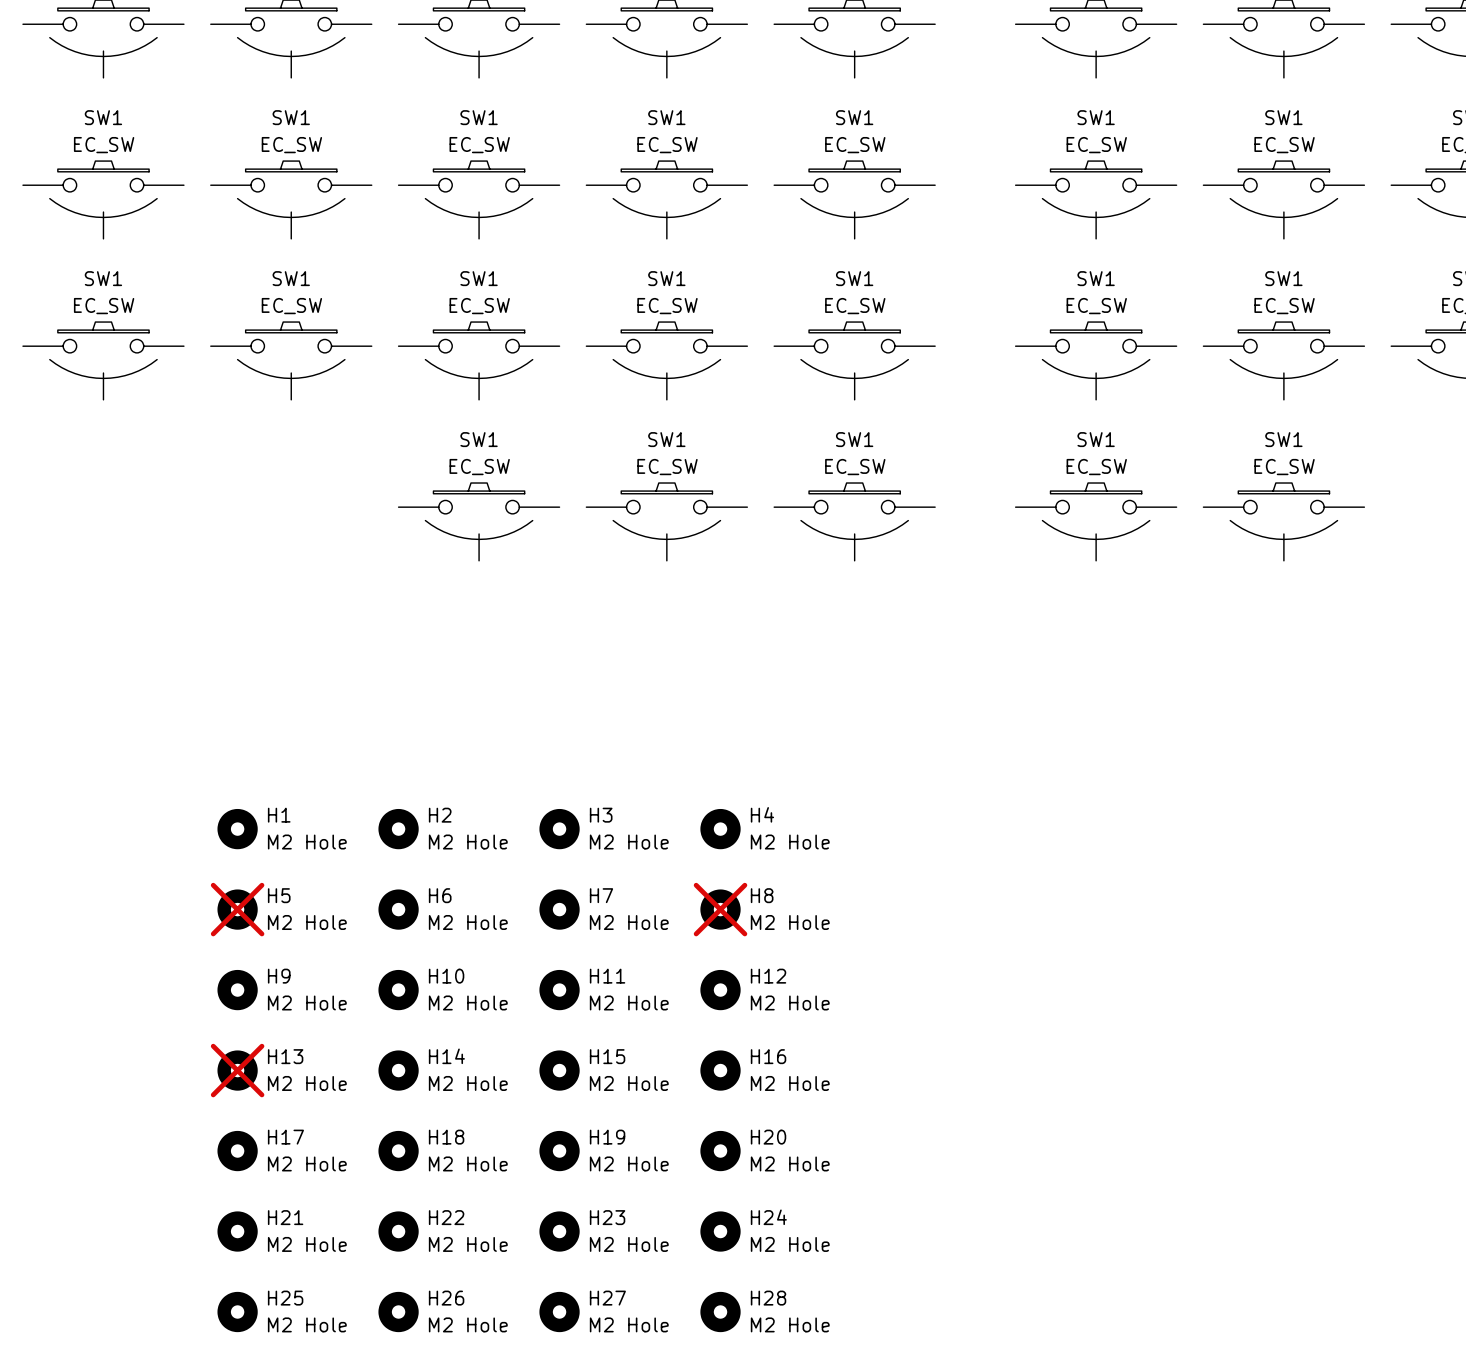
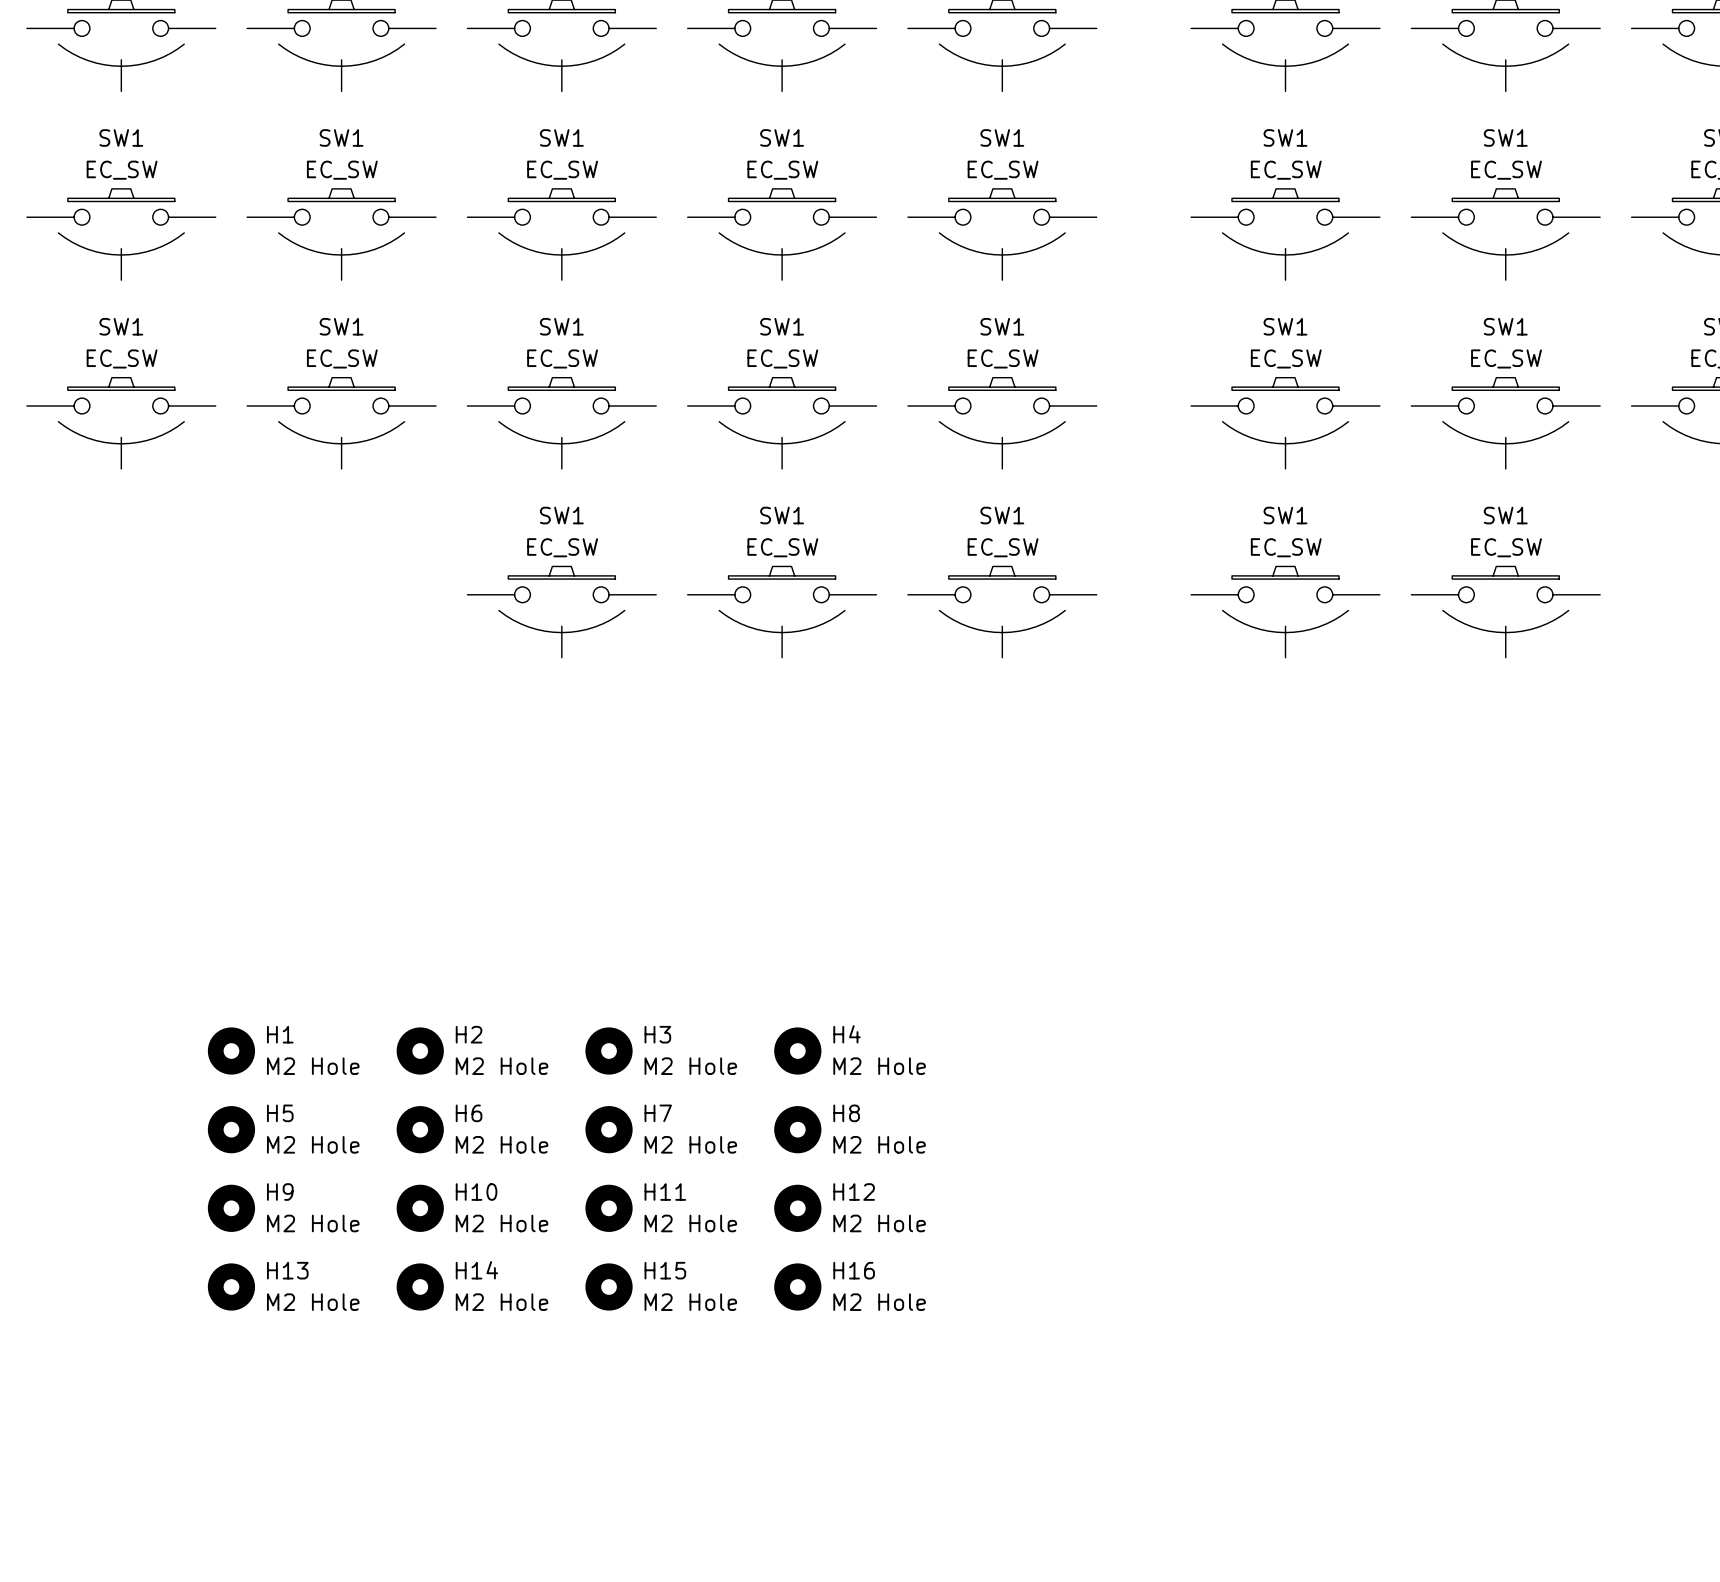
H1 position: (237, 829) -> (231, 1051)
H2 position: (398, 829) -> (420, 1051)
H3 position: (559, 829) -> (609, 1051)
H4 position: (720, 829) -> (797, 1051)
H5 position: (237, 909) -> (231, 1129)
H5 do-not-place cross: (237, 909) -> none
H6 position: (398, 909) -> (420, 1129)
H7 position: (559, 909) -> (609, 1129)
H8 position: (720, 909) -> (797, 1129)
H8 do-not-place cross: (720, 909) -> none
H9 position: (237, 990) -> (231, 1208)
H10 position: (398, 990) -> (420, 1208)
H11 position: (559, 990) -> (609, 1208)
H12 position: (720, 990) -> (797, 1208)
H13 position: (237, 1070) -> (231, 1286)
H13 do-not-place cross: (237, 1070) -> none
H14 position: (398, 1070) -> (420, 1286)
H15 position: (559, 1070) -> (609, 1286)
H16 position: (720, 1070) -> (797, 1286)
H17: M2 Hole (237, 1151) -> none
H18: M2 Hole (398, 1151) -> none
H19: M2 Hole (559, 1151) -> none
H20: M2 Hole (720, 1151) -> none
H21: M2 Hole (237, 1231) -> none
H22: M2 Hole (398, 1231) -> none
H23: M2 Hole (559, 1231) -> none
H24: M2 Hole (720, 1231) -> none
H25: M2 Hole (237, 1312) -> none
H26: M2 Hole (398, 1312) -> none
H27: M2 Hole (559, 1312) -> none
H28: M2 Hole (720, 1312) -> none

